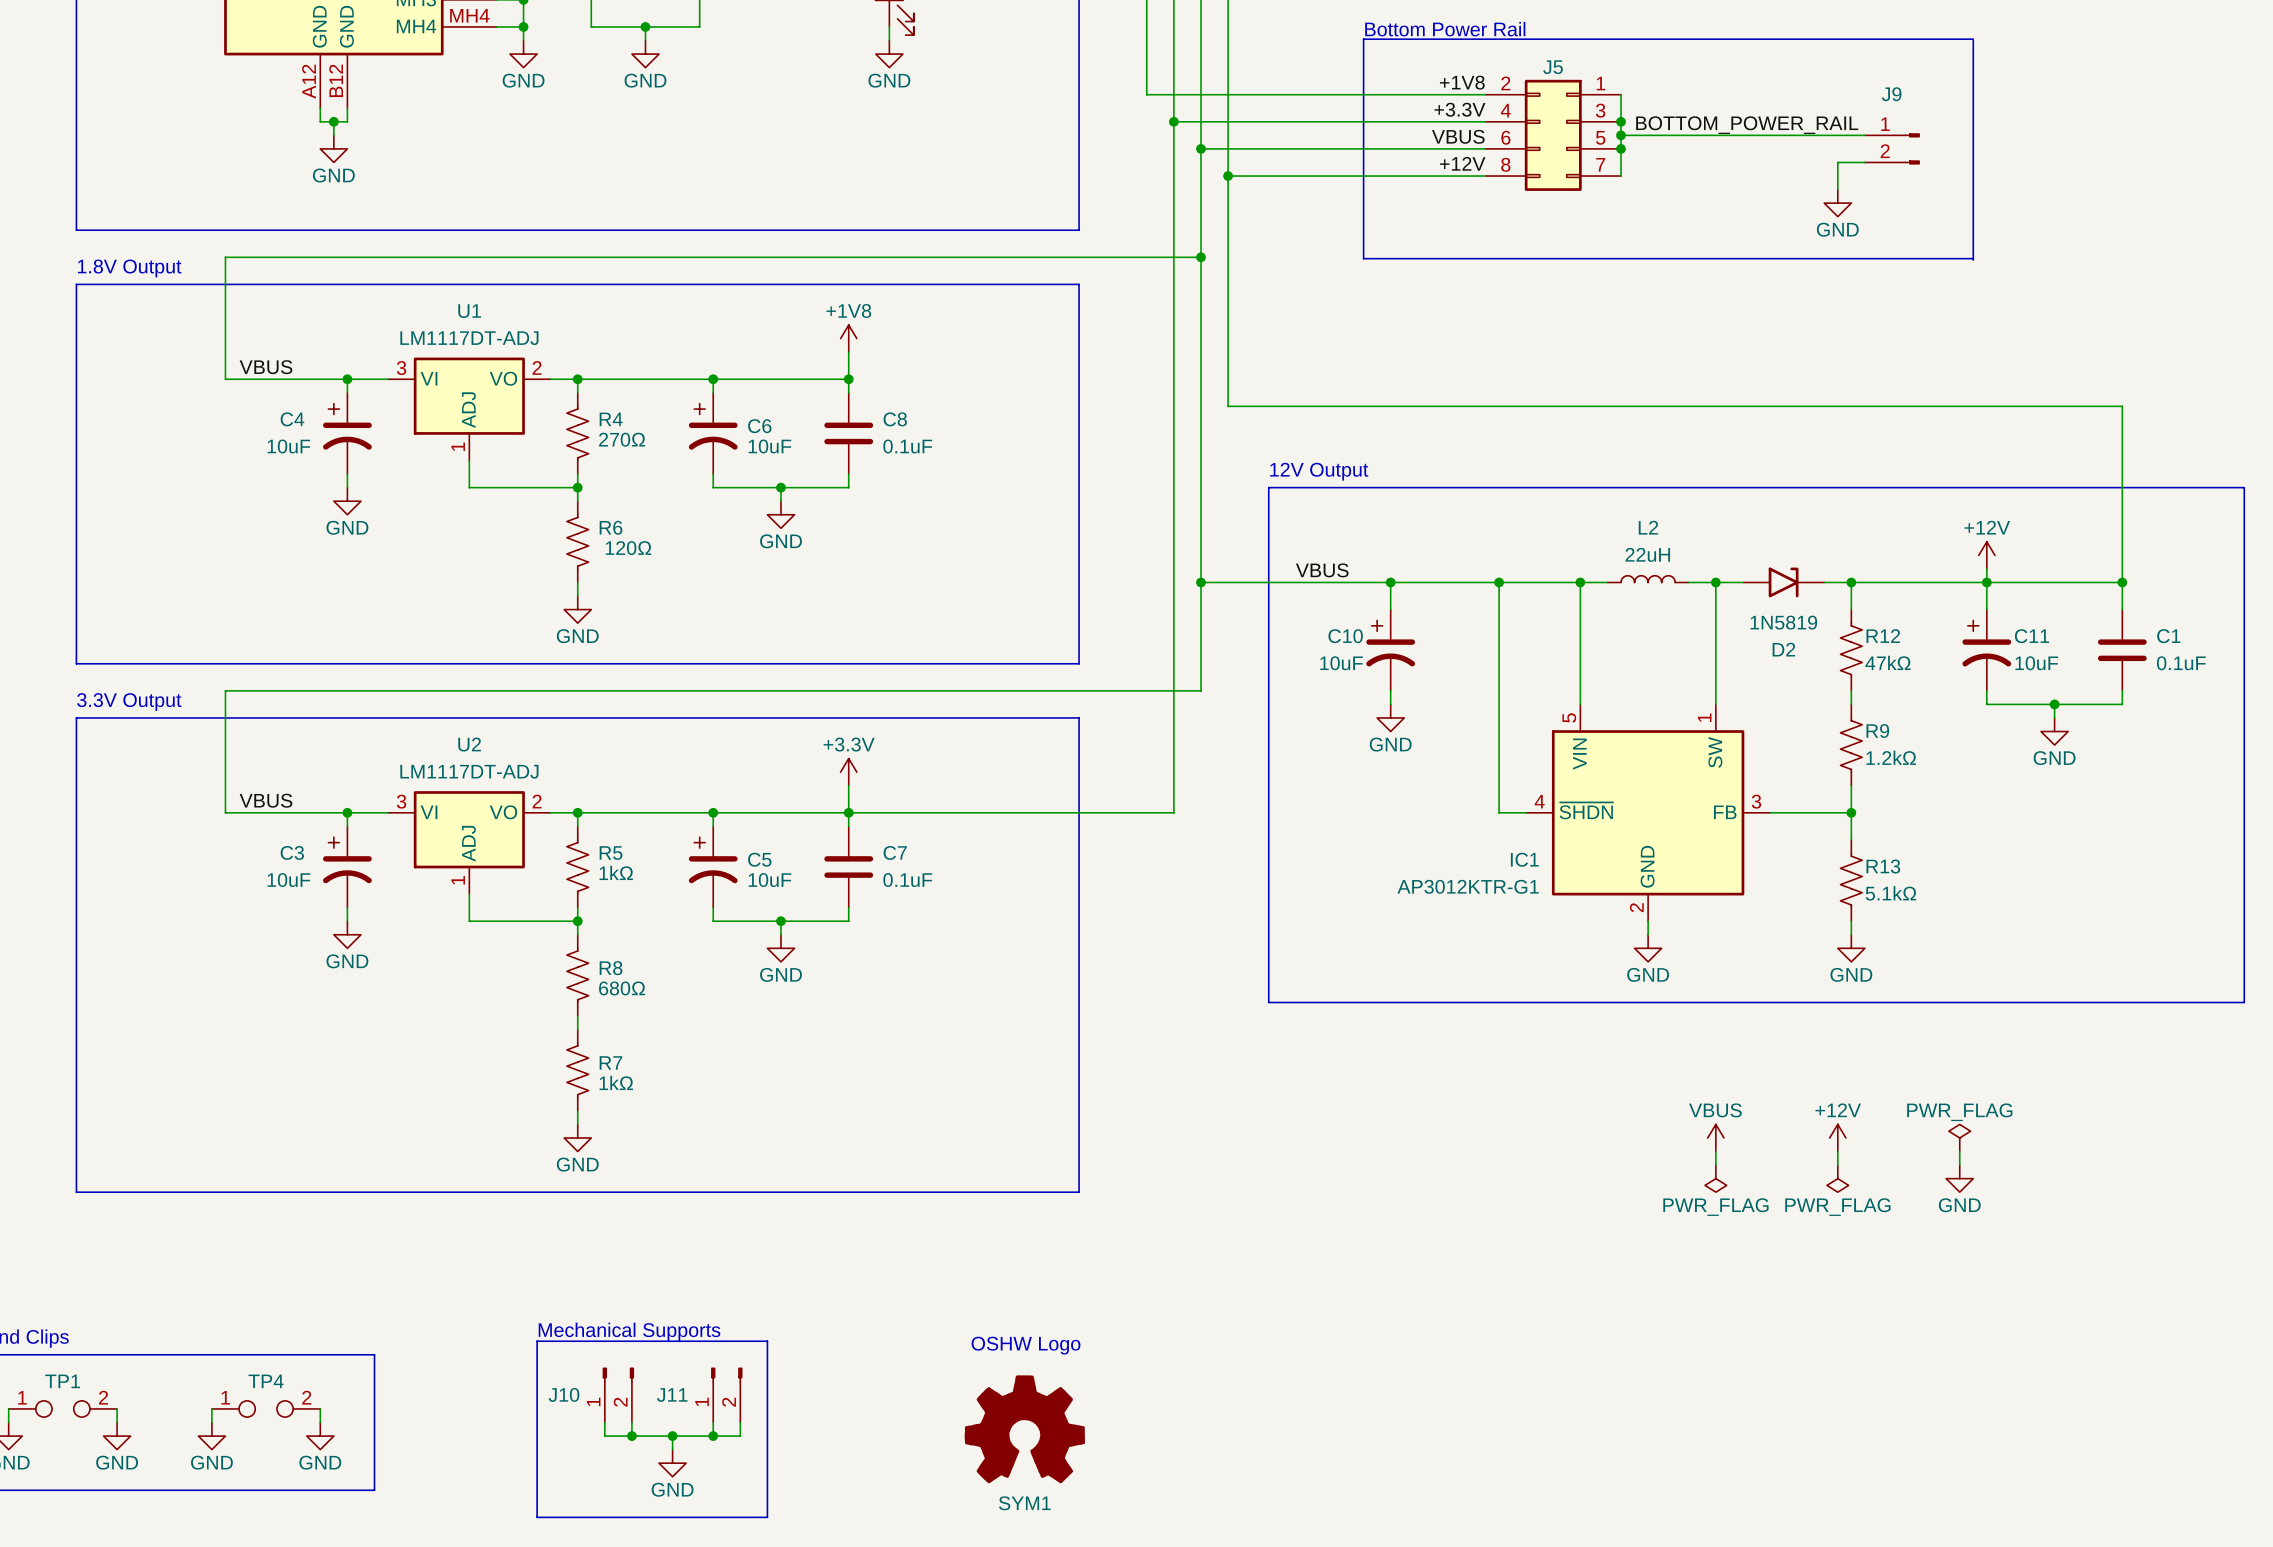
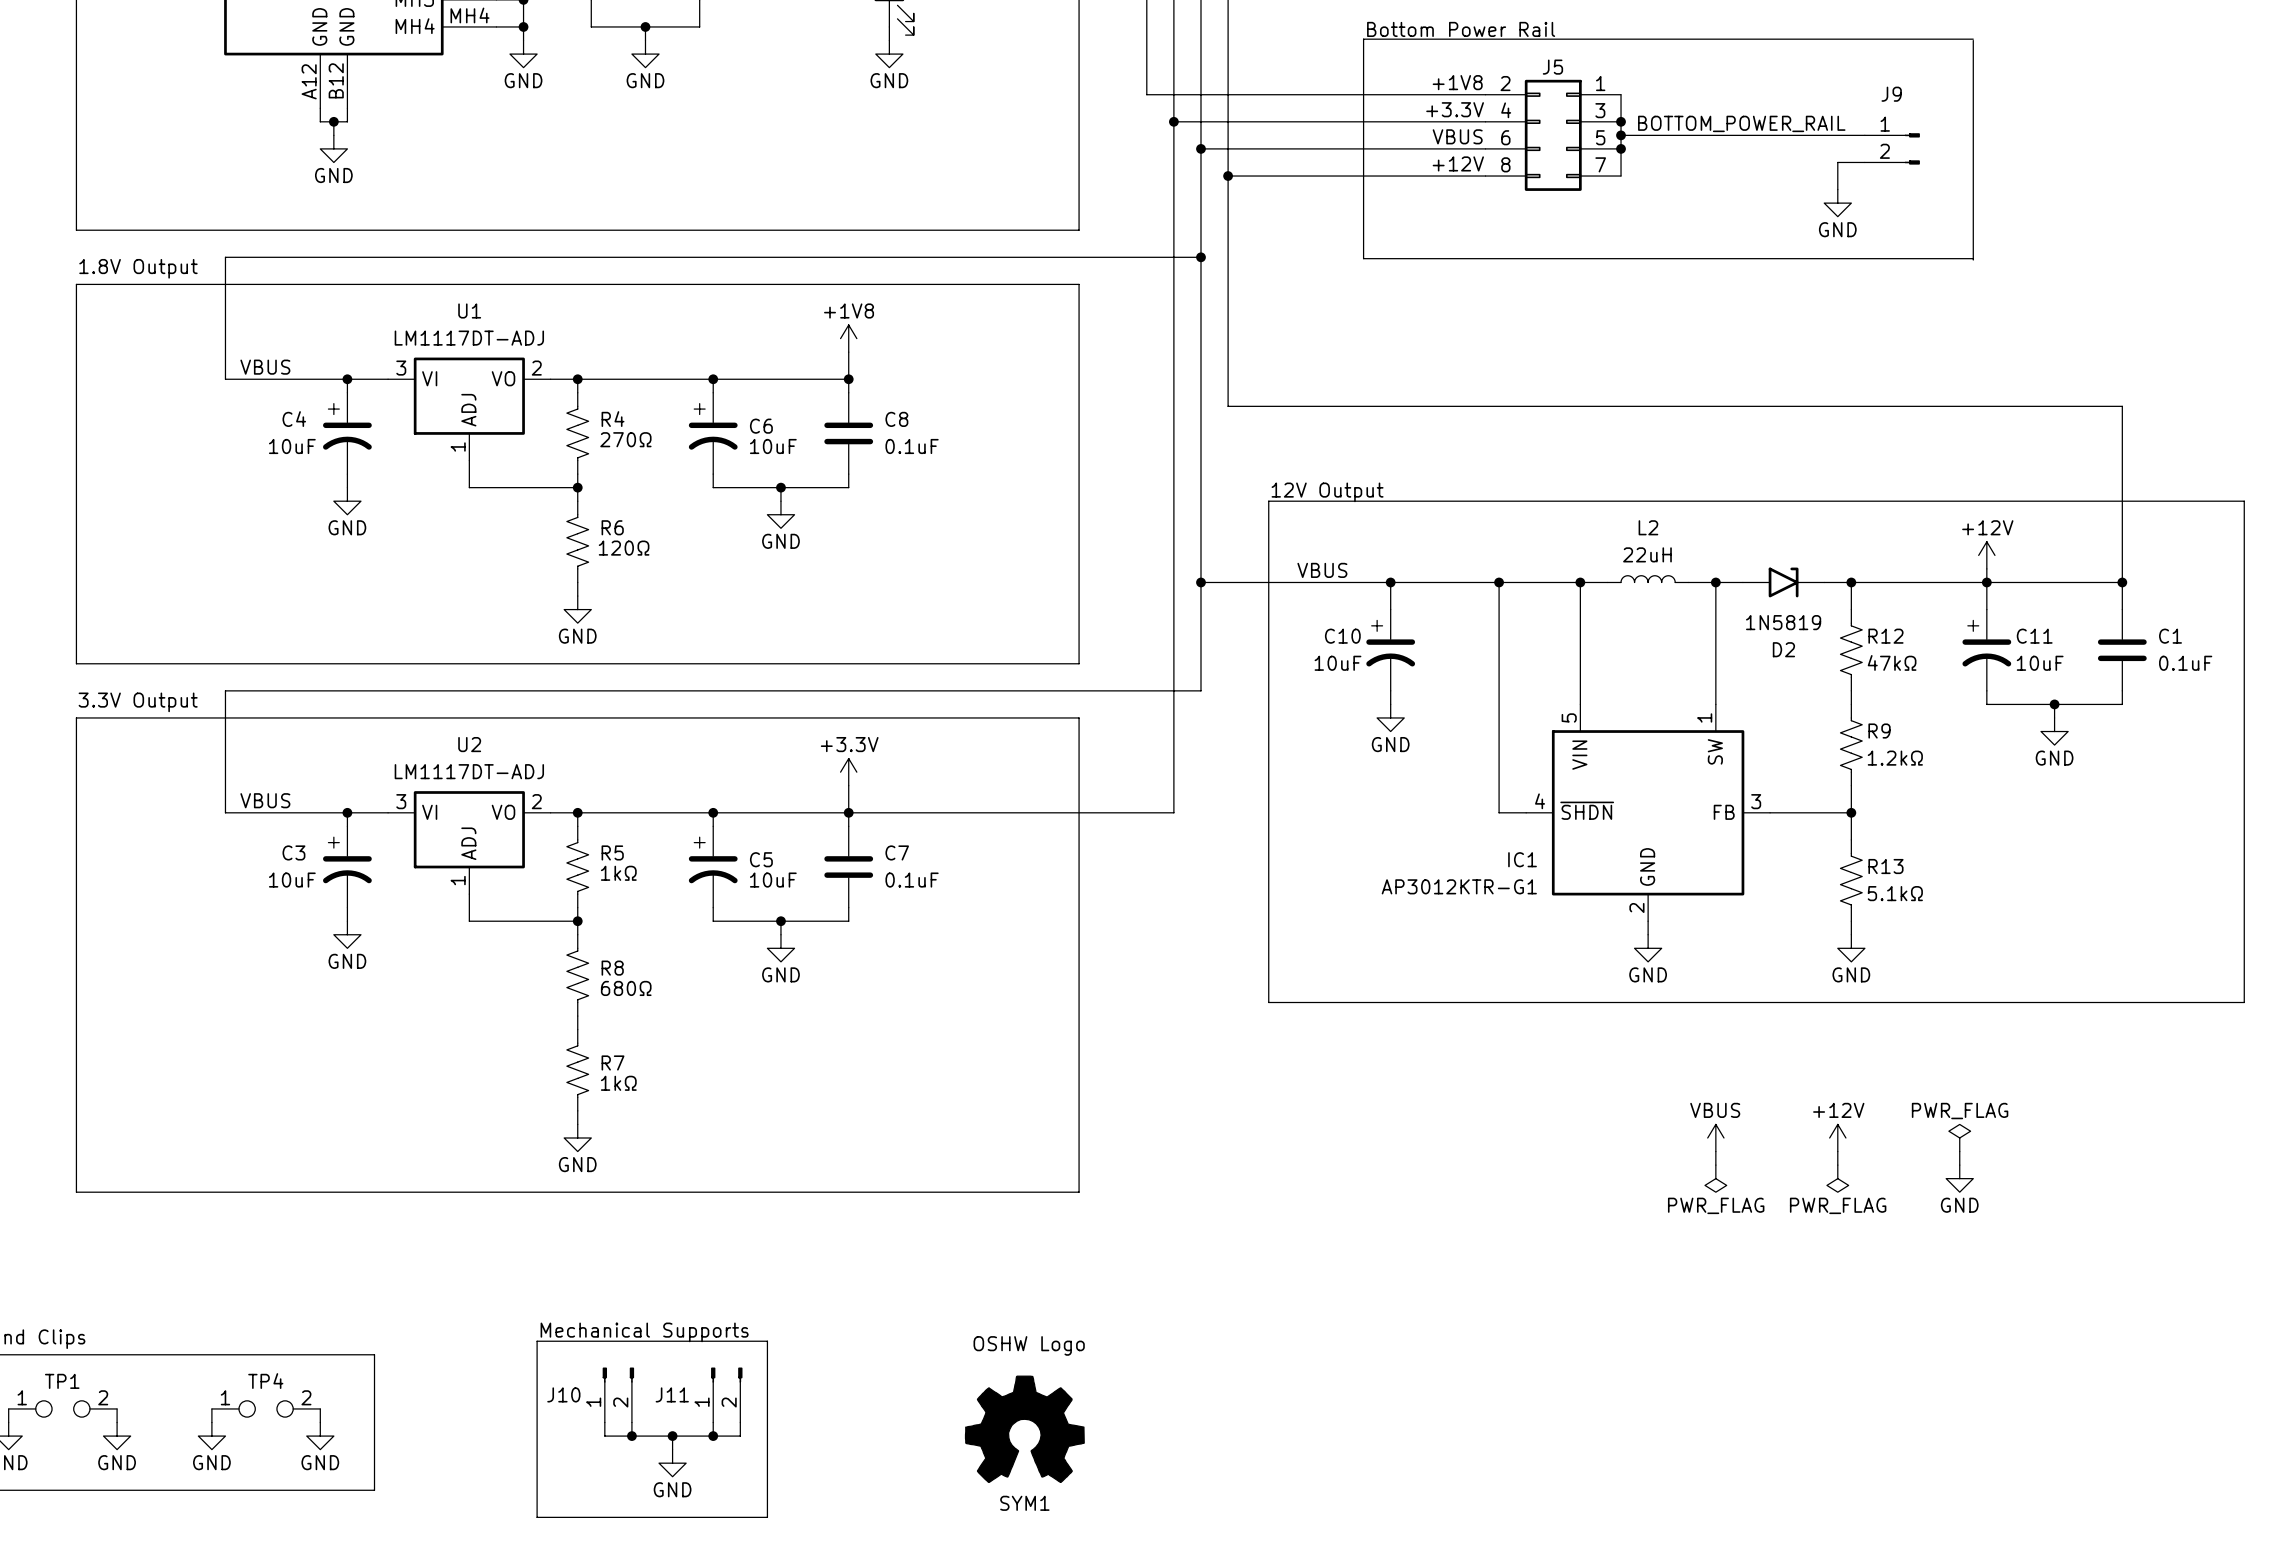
text position: 12V Output (1319, 471) -> 12V Output (1327, 492)
line: (1268, 501) (1268, 487) (2244, 487) (2244, 501) -> (1268, 501) (2244, 501)

